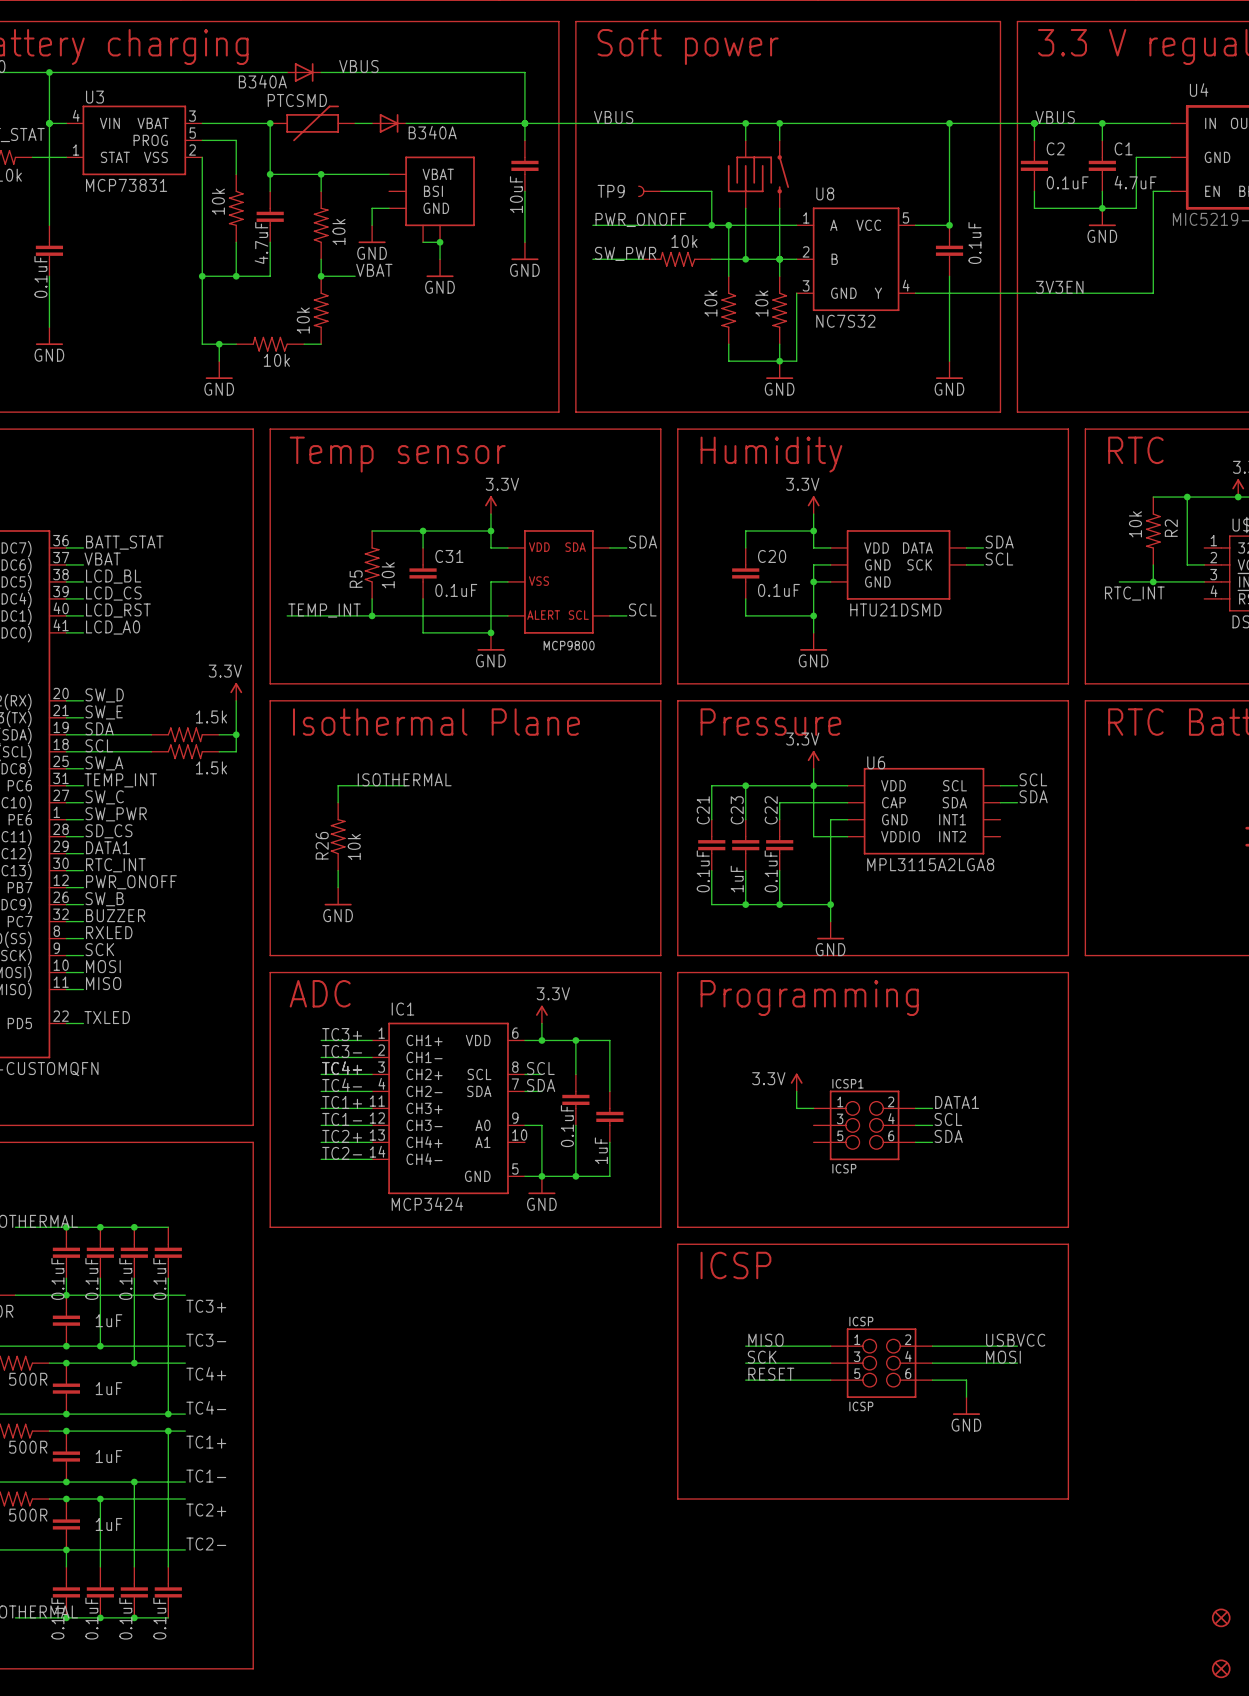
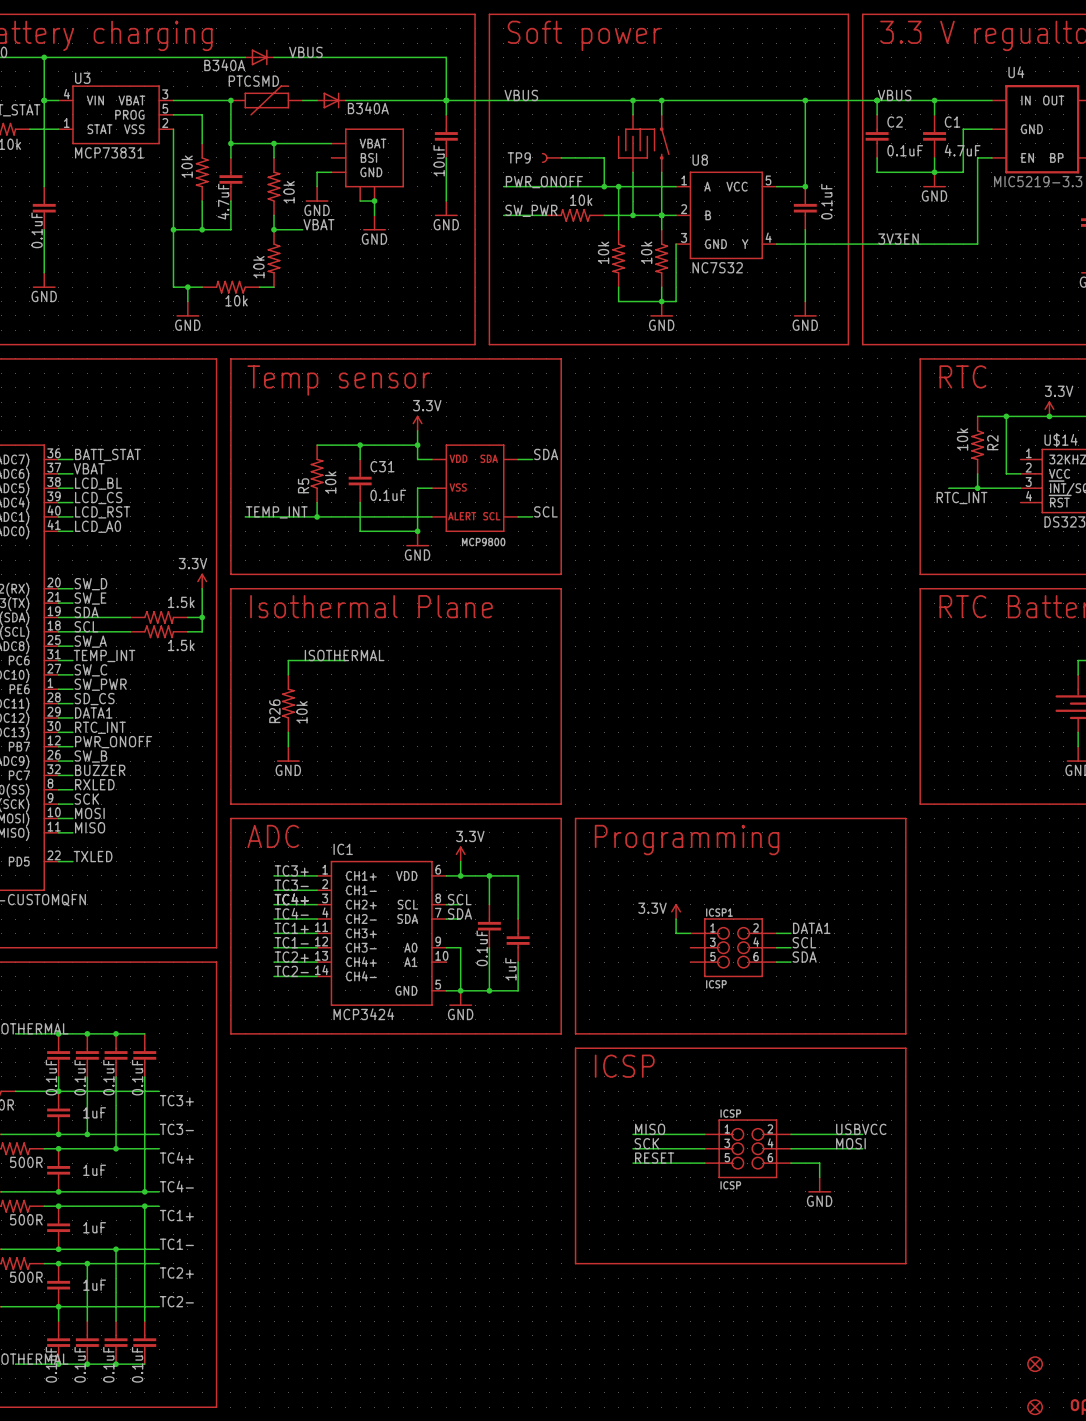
line: (677, 429) (1068, 429) (1068, 683) (677, 683) (677, 429) -> none
text: Humidity (771, 454) -> none
power symbol: 3.3V (813, 505) -> none
wire: (813, 514) (813, 547) (830, 547) -> none
wire: (813, 530) (745, 530) (745, 547) -> none
junction: (813, 530) -> none
label: SDA (999, 542) -> none
wire: (966, 547) (983, 547) -> none
label: SCL (999, 559) -> none
wire: (830, 564) (813, 564) (813, 632) -> none
part: HTU21DSMD (898, 564) -> none
wire: (966, 564) (983, 564) -> none
C20: 0.1uF (745, 573) -> none
wire: (813, 581) (830, 581) -> none
junction: (813, 581) -> none
wire: (745, 598) (745, 615) (813, 615) -> none
junction: (813, 615) -> none
power symbol: GND (813, 641) -> none
line: (677, 700) (677, 955) (1068, 955) (1068, 700) (677, 700) -> none
text: Pressure (770, 722) -> none
power symbol: 3.3V (813, 759) -> none
wire: (813, 768) (813, 836) (847, 836) -> none
label: SCL (1033, 779) -> none
wire: (745, 785) (745, 819) -> none
junction: (745, 785) -> none
junction: (813, 785) -> none
wire: (847, 785) (711, 785) (711, 819) -> none
wire: (1000, 785) (1017, 785) -> none
label: SDA (1033, 796) -> none
wire: (847, 802) (779, 802) (779, 819) -> none
wire: (1000, 802) (1017, 802) -> none
U6: MPL3115A2LGA8 (924, 811) -> none
wire: (847, 819) (830, 819) (830, 921) -> none
C21: 0.1uF (711, 845) -> none
C23: 1uF (745, 845) -> none
C22: 0.1uF (779, 845) -> none
wire: (711, 870) (711, 904) (830, 904) -> none
wire: (745, 870) (745, 904) -> none
wire: (779, 870) (779, 904) -> none
junction: (745, 904) -> none
junction: (779, 904) -> none
junction: (830, 904) -> none
power symbol: GND (830, 930) -> none

